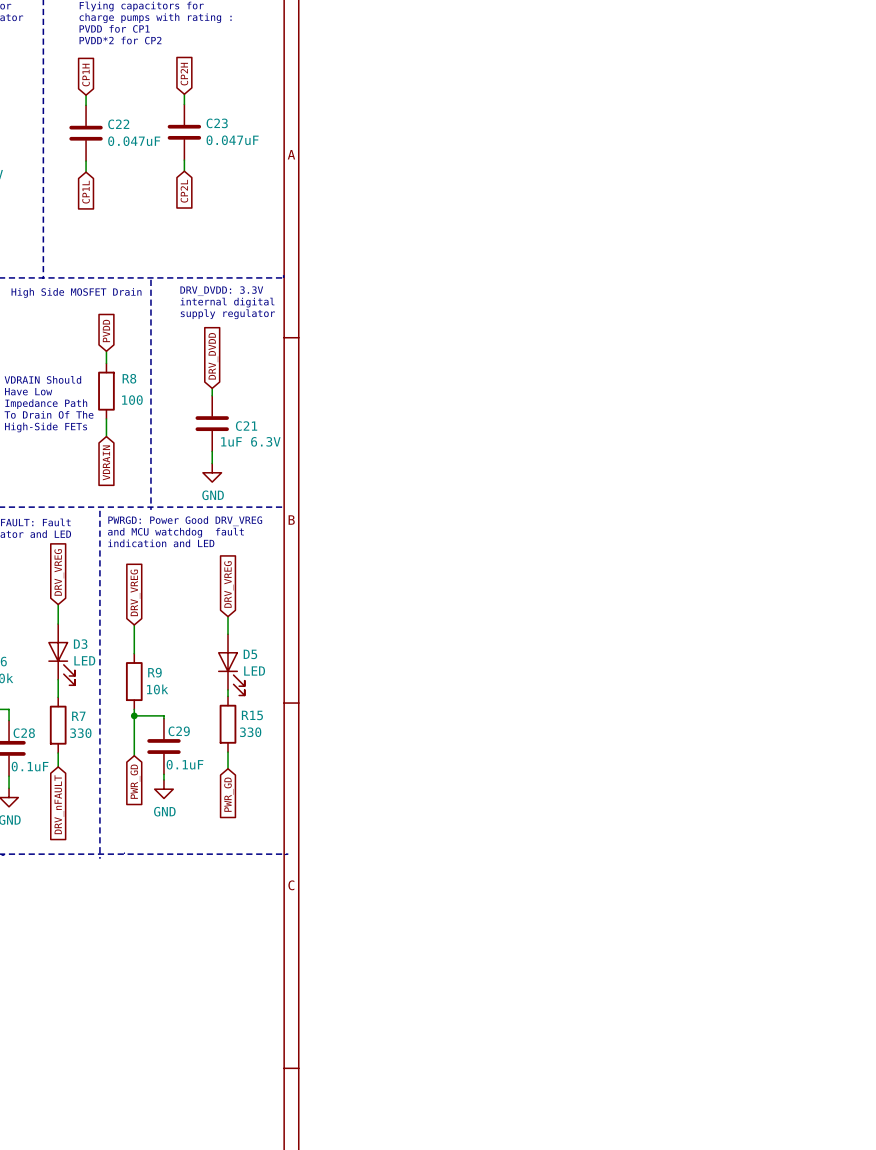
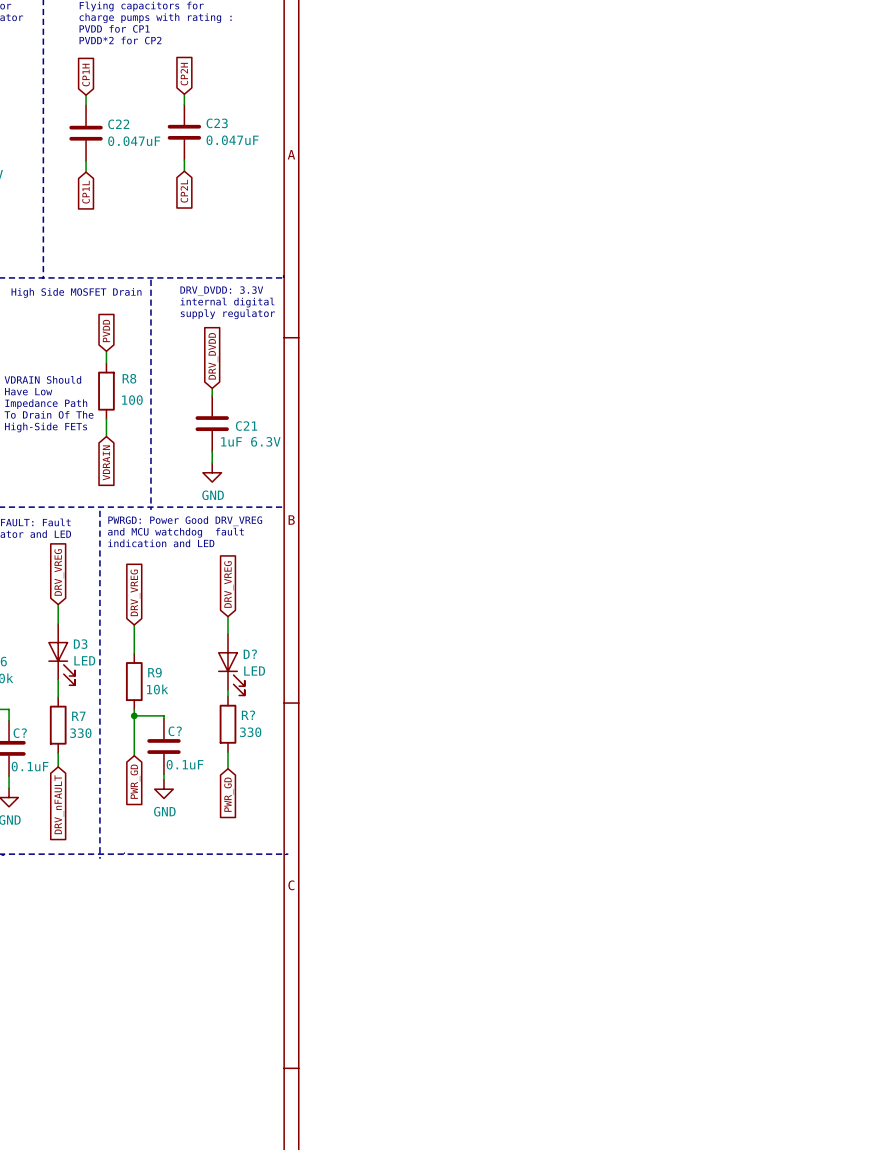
D5 name: D5 (250, 654) -> D? (250, 654)
R15 name: R15 (252, 715) -> R? (248, 715)
C29 name: C29 (179, 731) -> C? (175, 731)
C28 name: C28 (24, 733) -> C? (20, 733)

